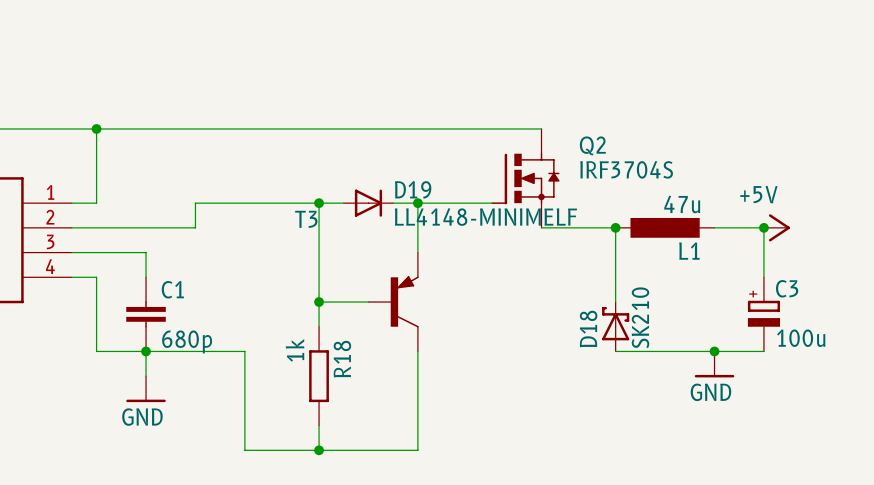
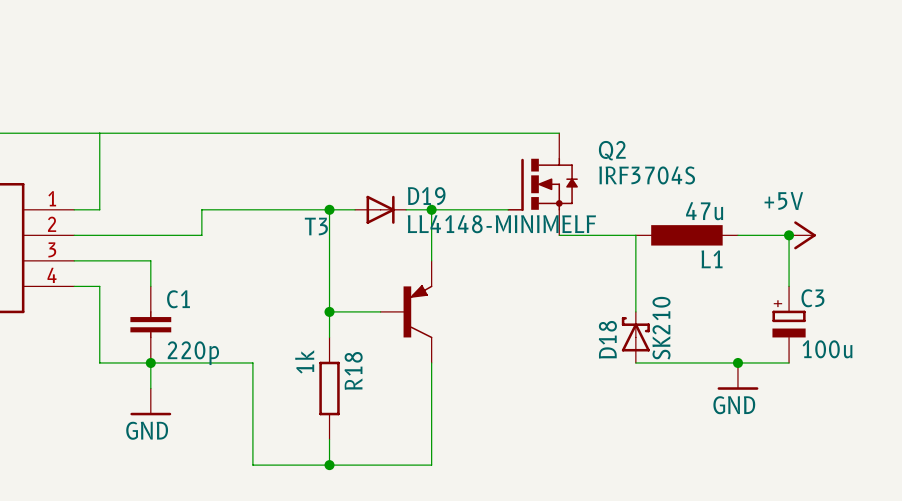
junction: (96, 128) -> none
junction: (615, 227) -> none
C1 value: 680p (187, 341) -> 220p (193, 353)

